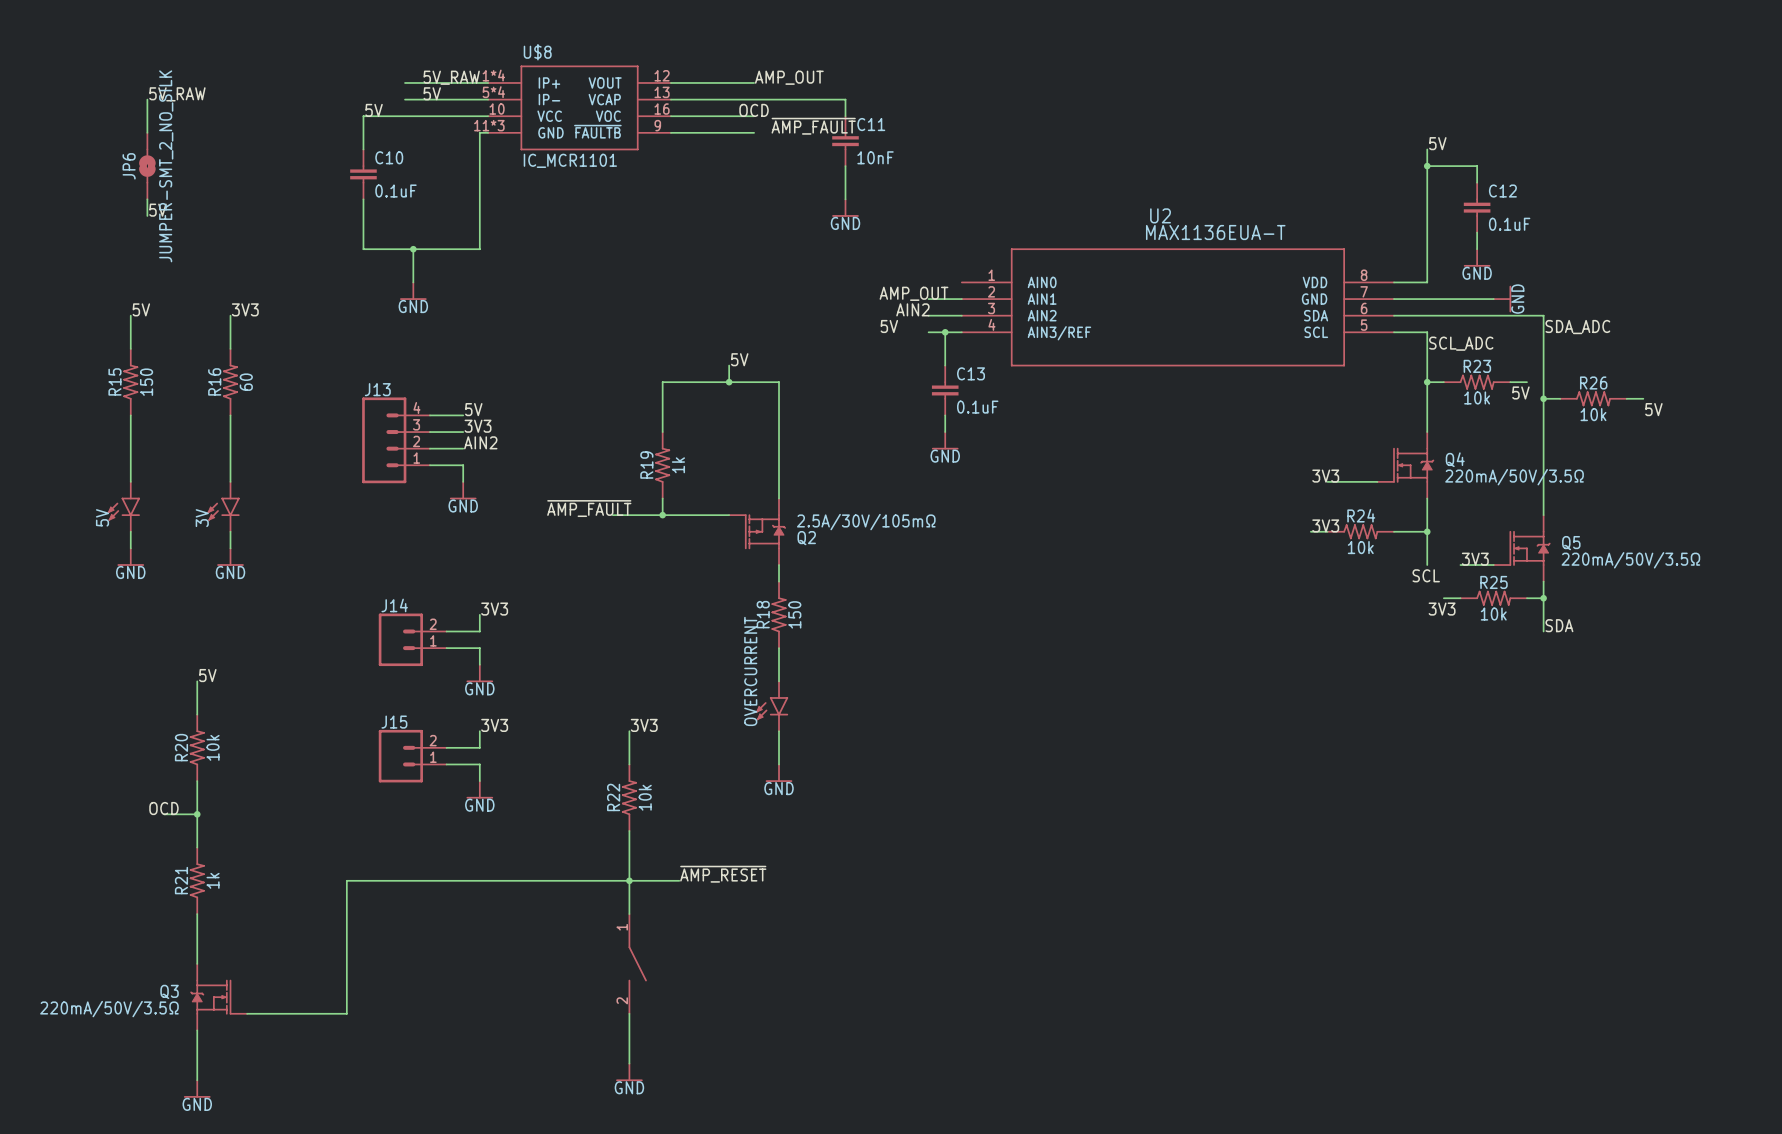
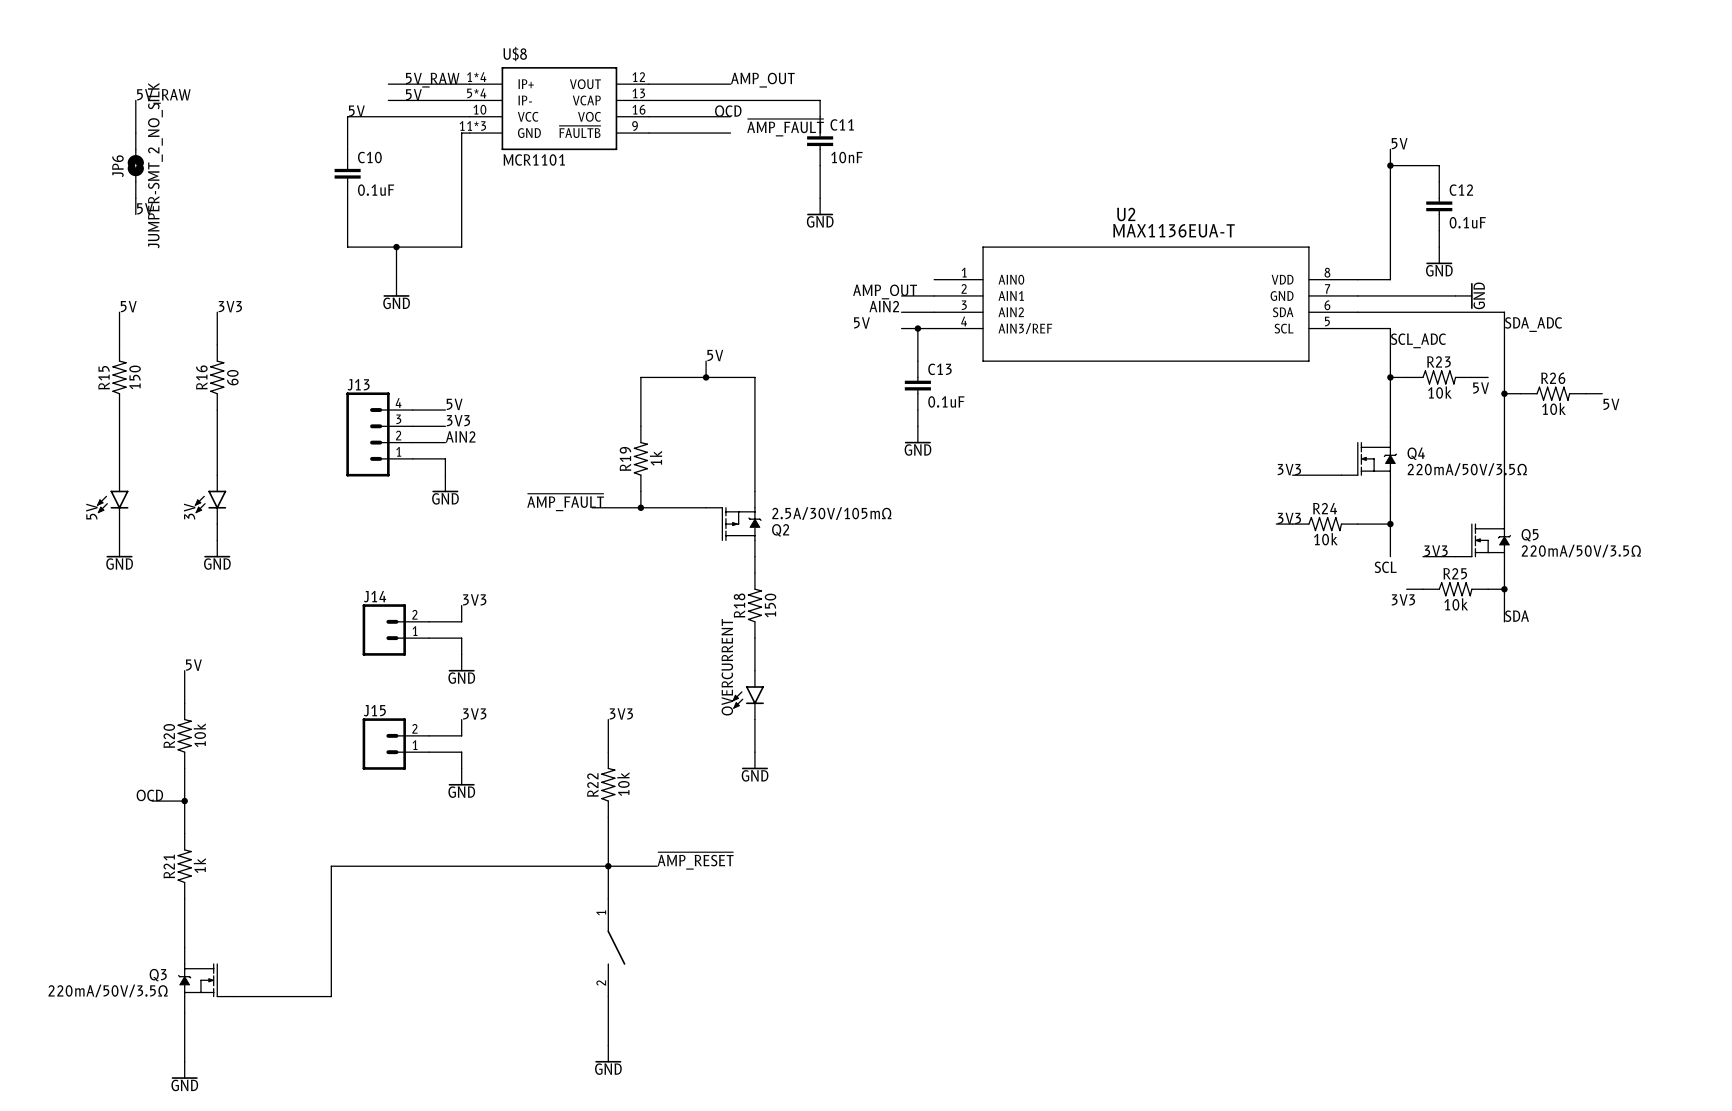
U$8 value: IC_MCR1101 (570, 160) -> MCR1101 (534, 159)

